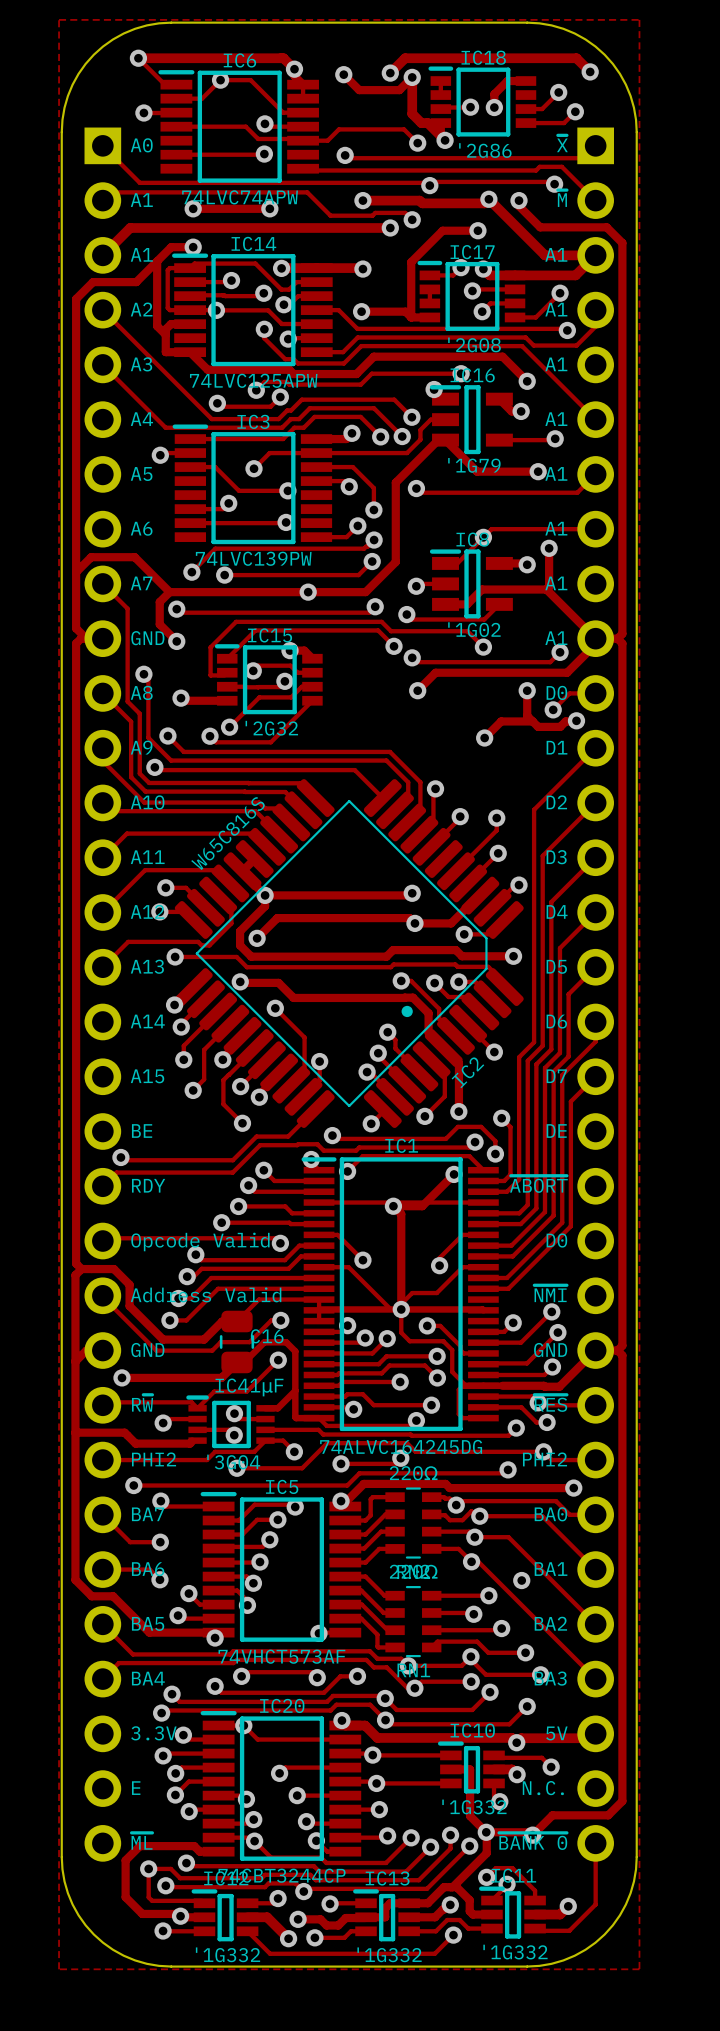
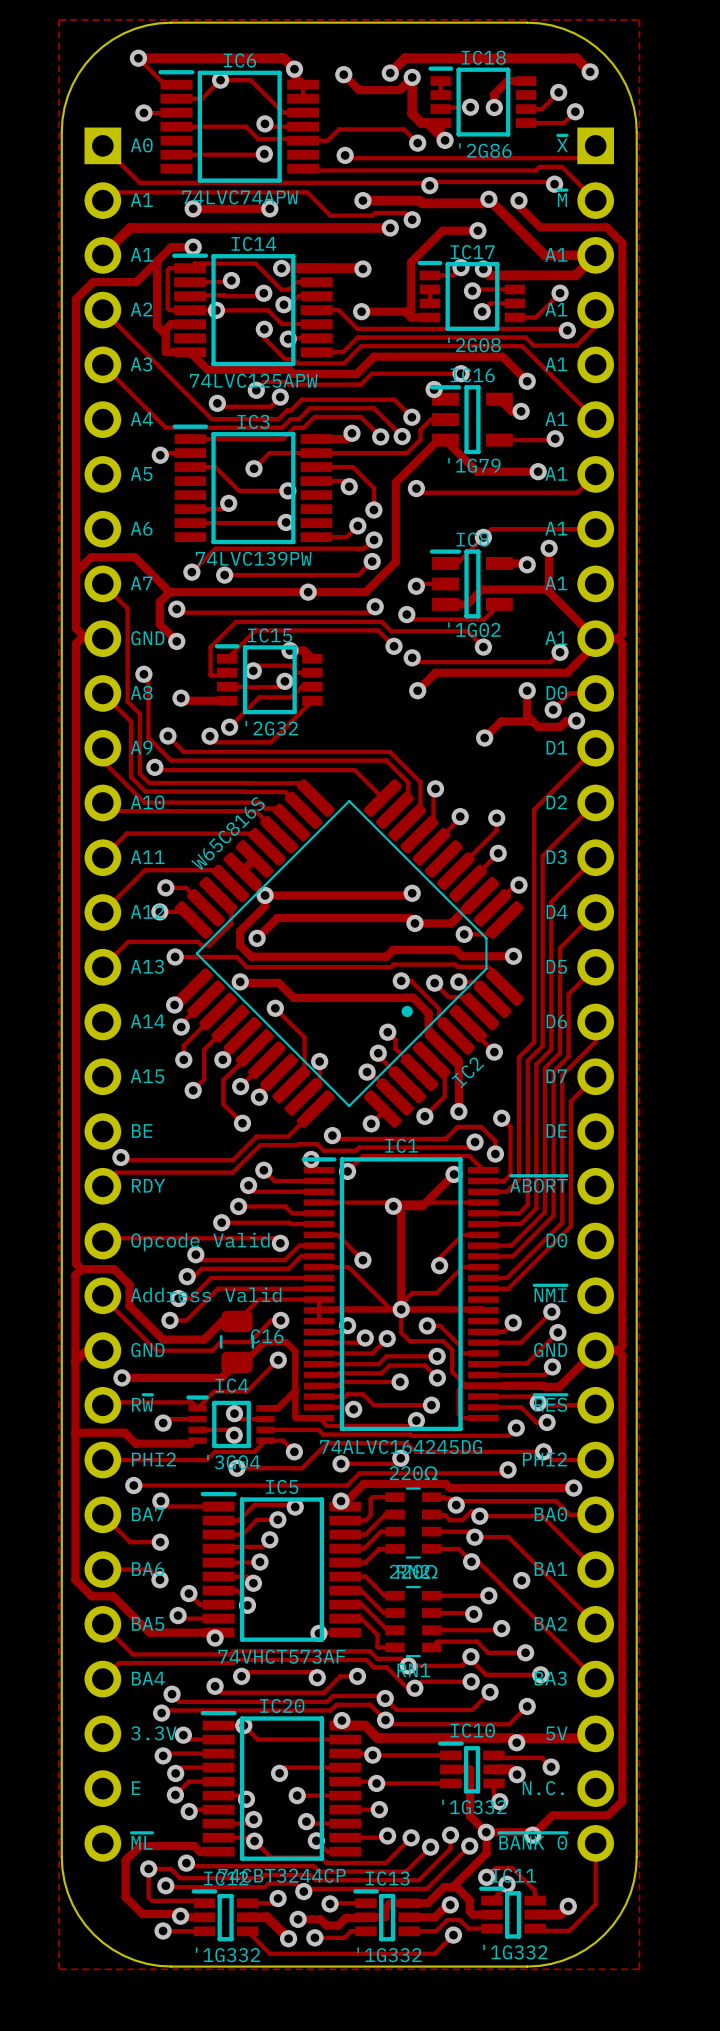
C16 text: 1μF (266, 1387) -> none

